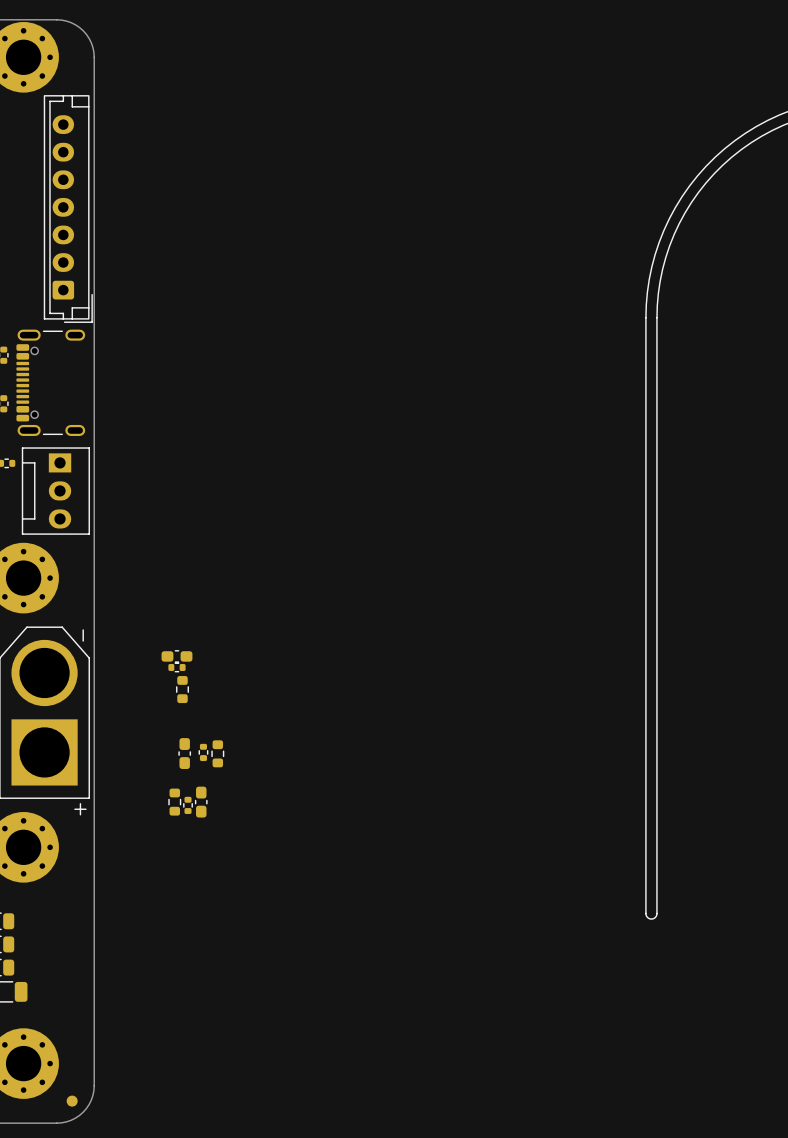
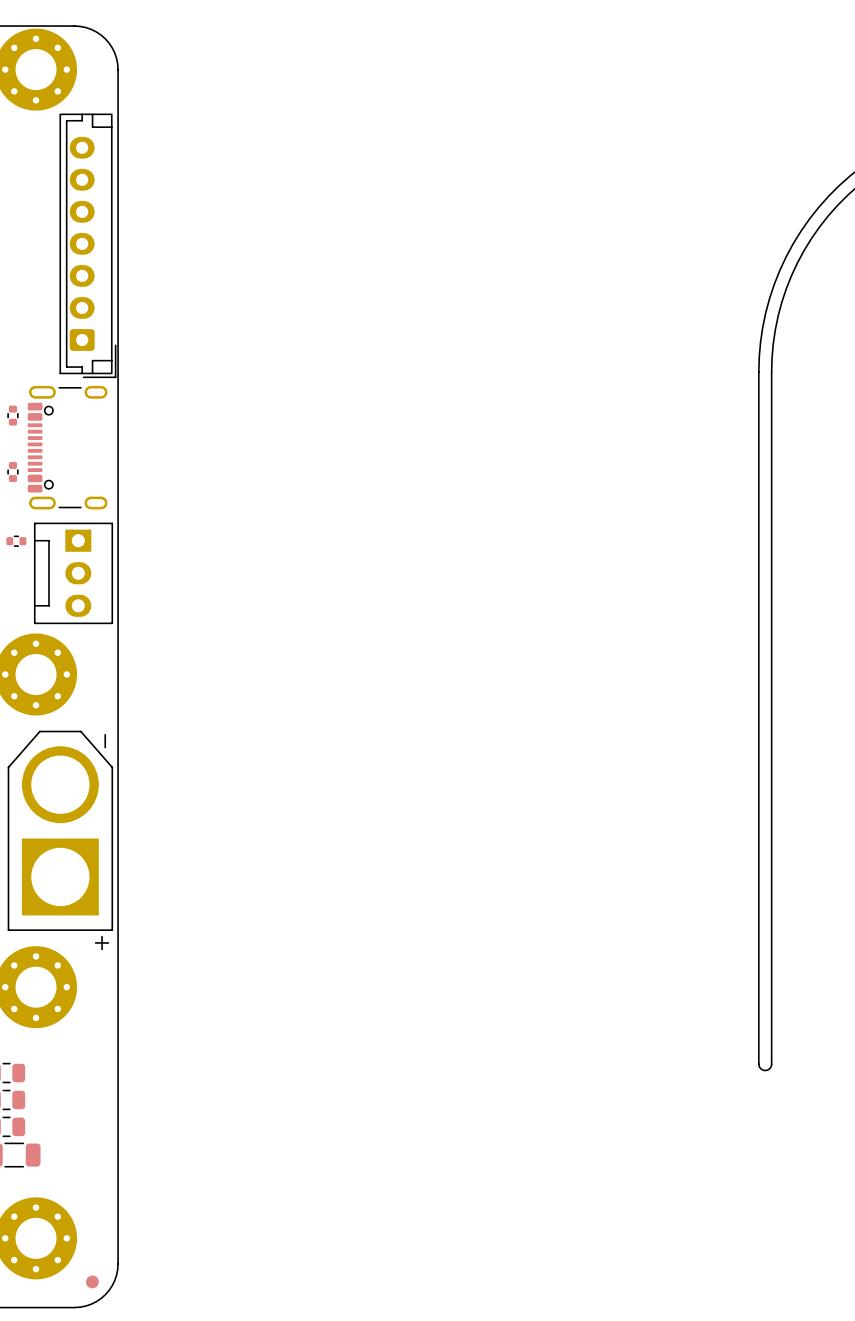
part: (176, 656) -> none
part: (176, 667) -> none
part: (182, 689) -> none
part: (203, 752) -> none
part: (184, 753) -> none
part: (217, 753) -> none
part: (174, 802) -> none
part: (201, 802) -> none
part: (188, 805) -> none

